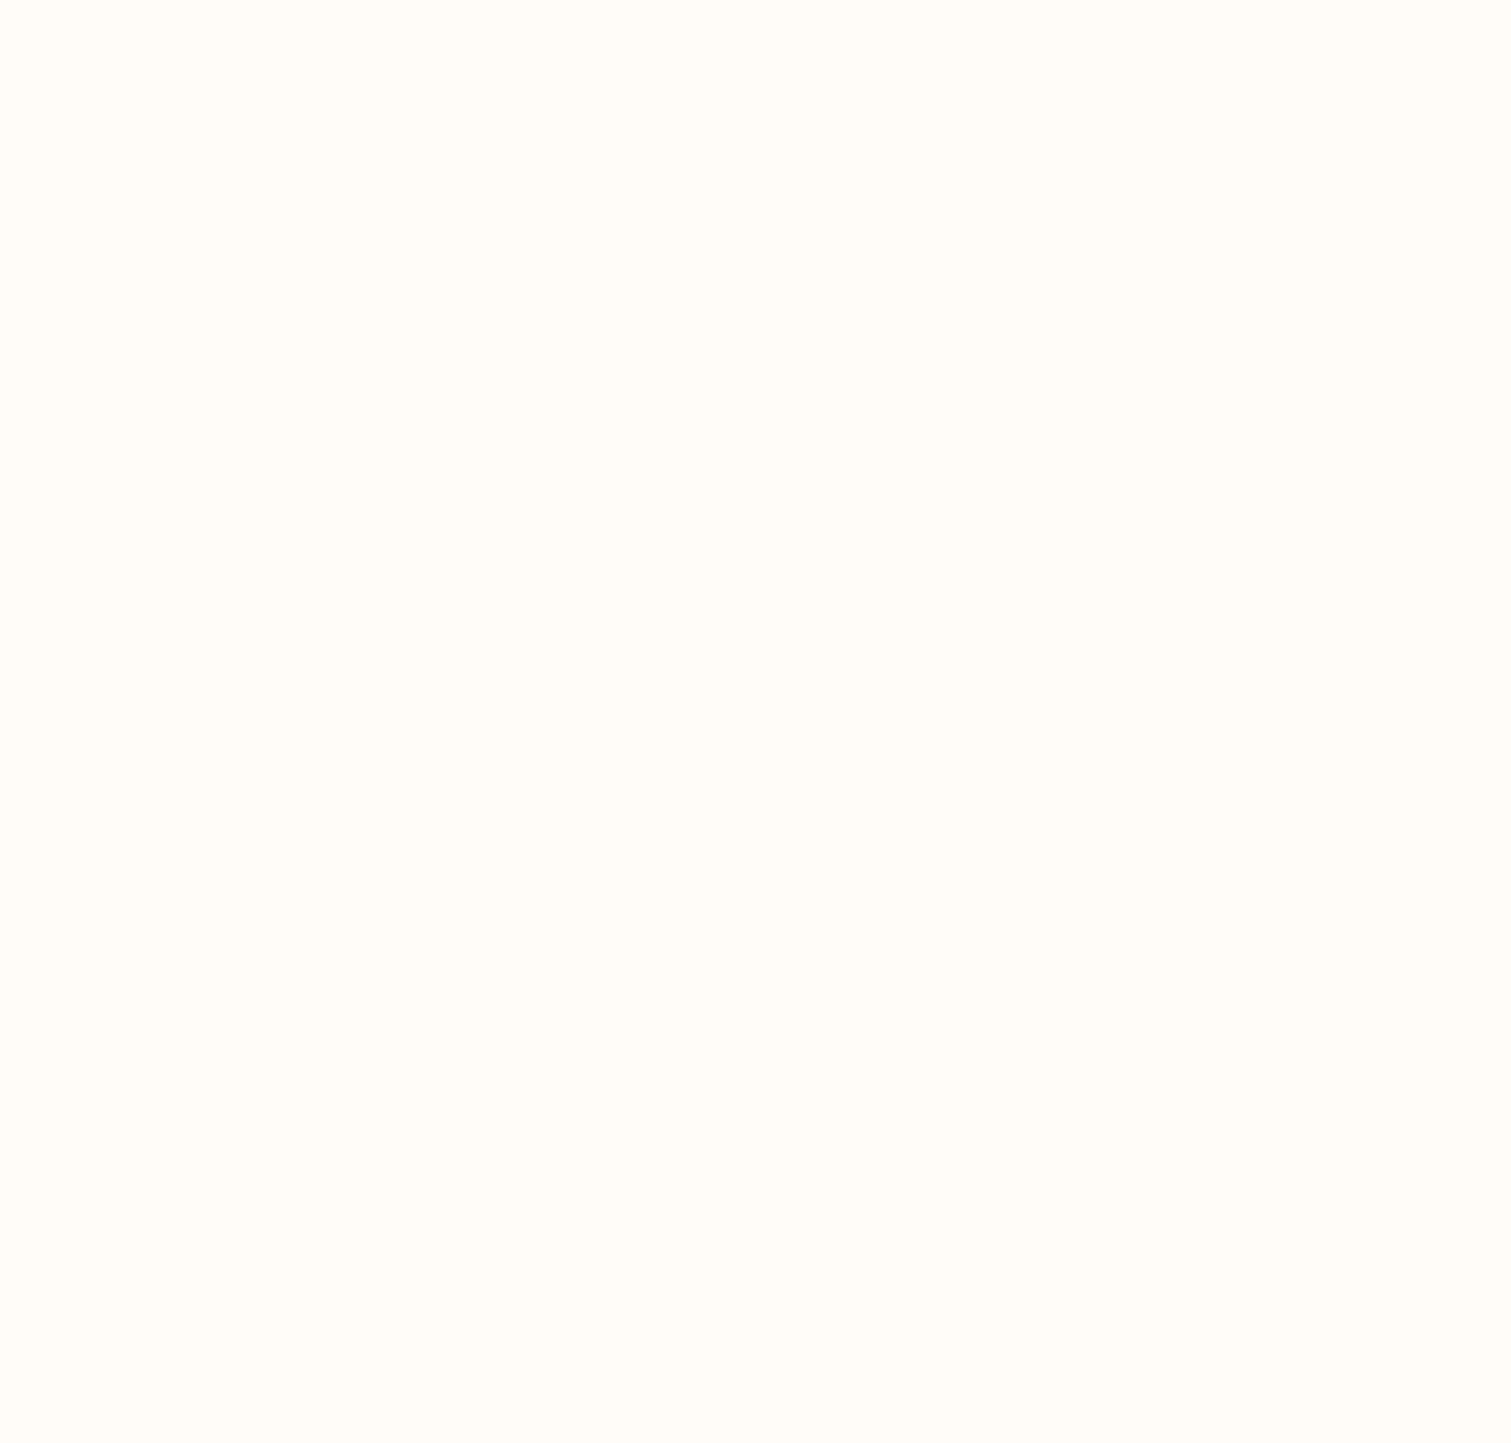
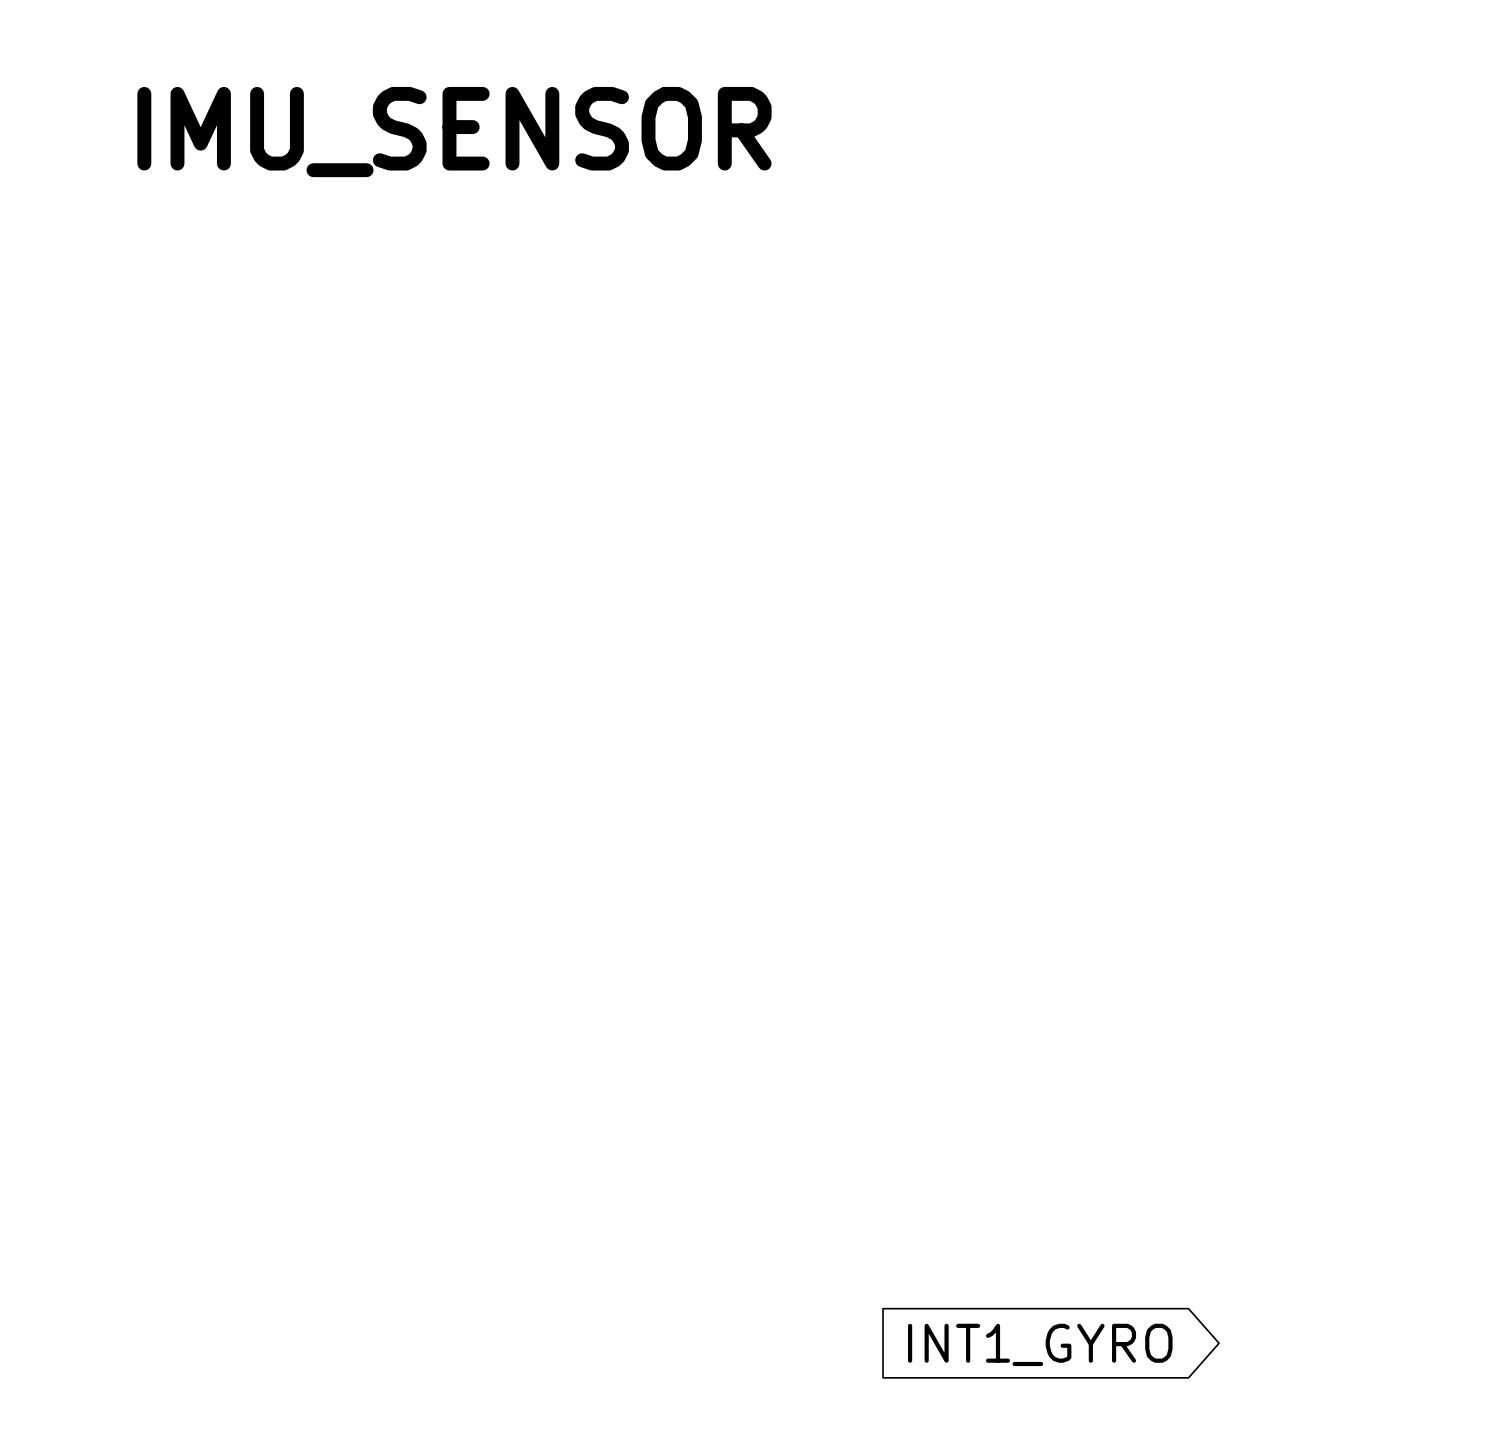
text: none -> IMU_SENSOR (454, 132)
global label: none -> INT1_GYRO (1040, 1344)

